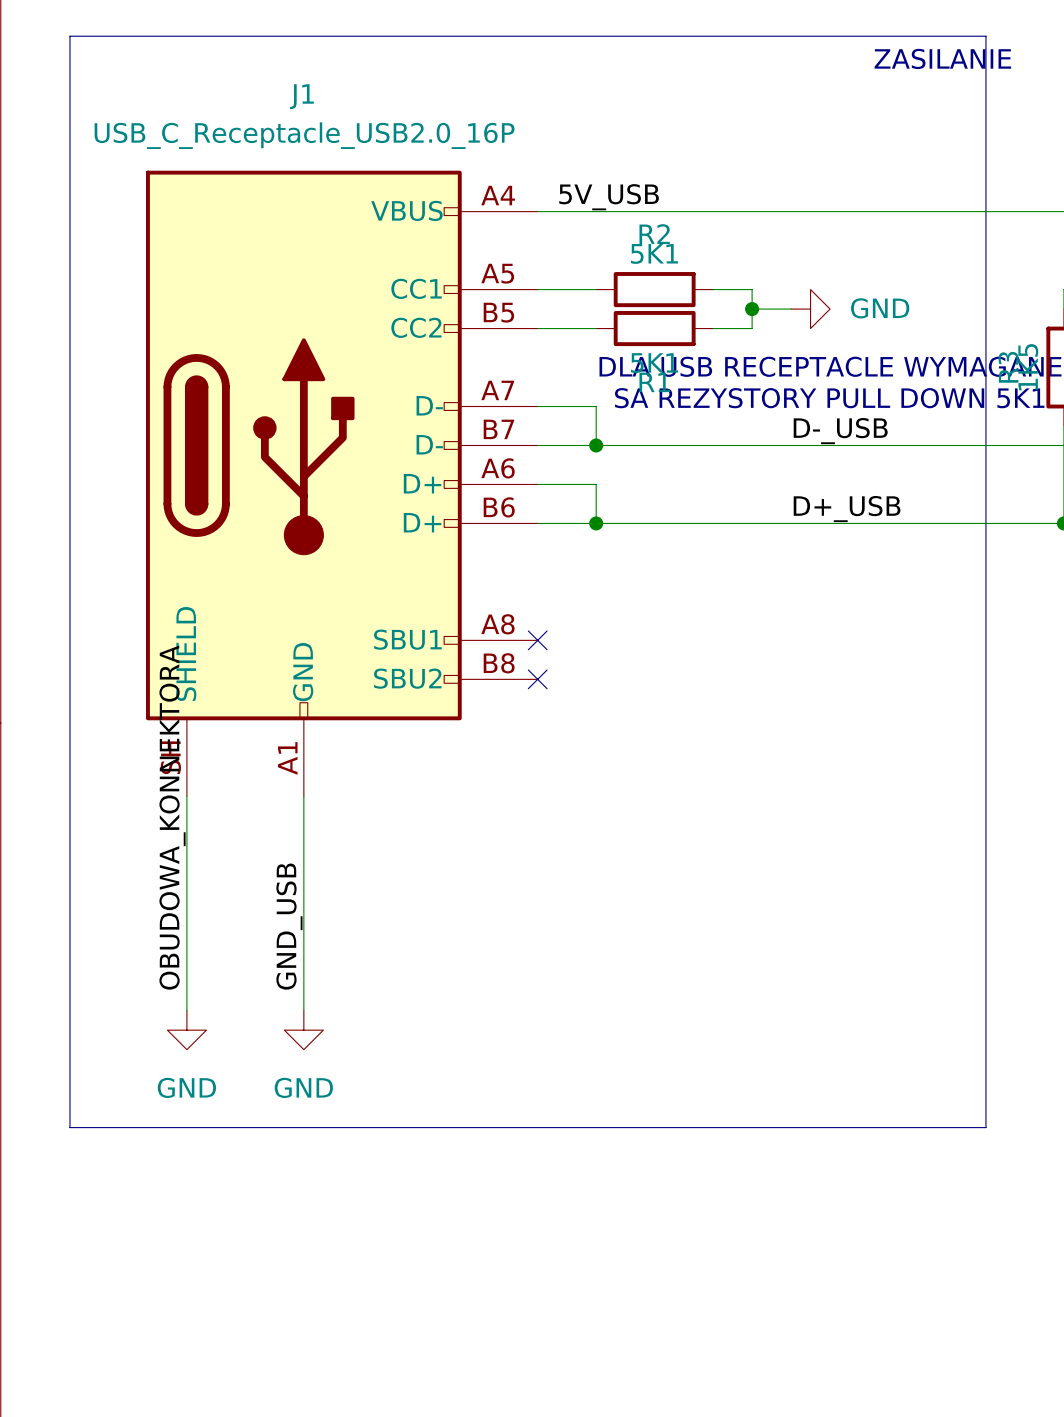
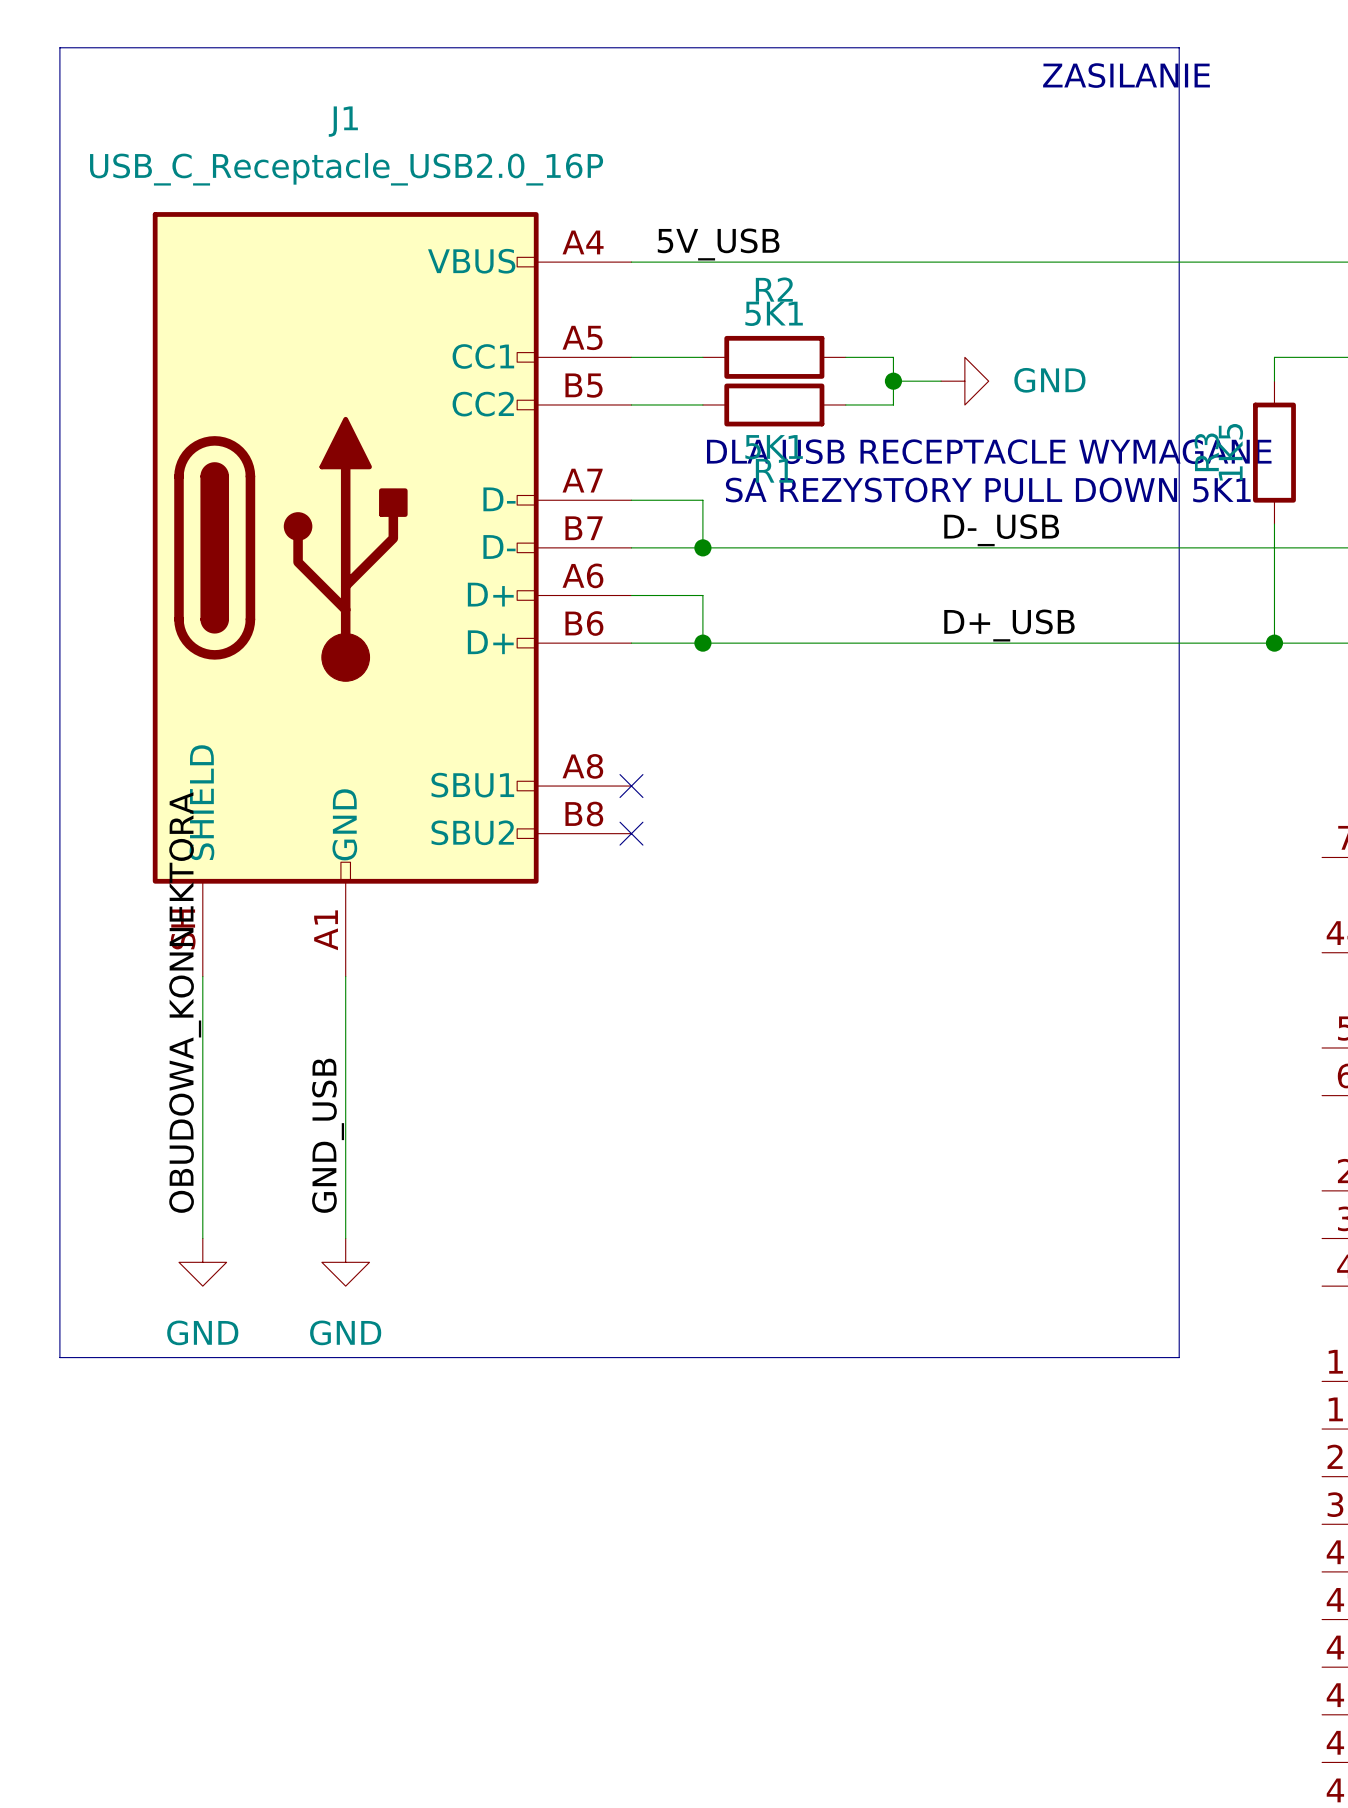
line: (69, 1108) (69, 1127) (985, 1127) (985, 1108) -> (59, 1357) (1179, 1357)

